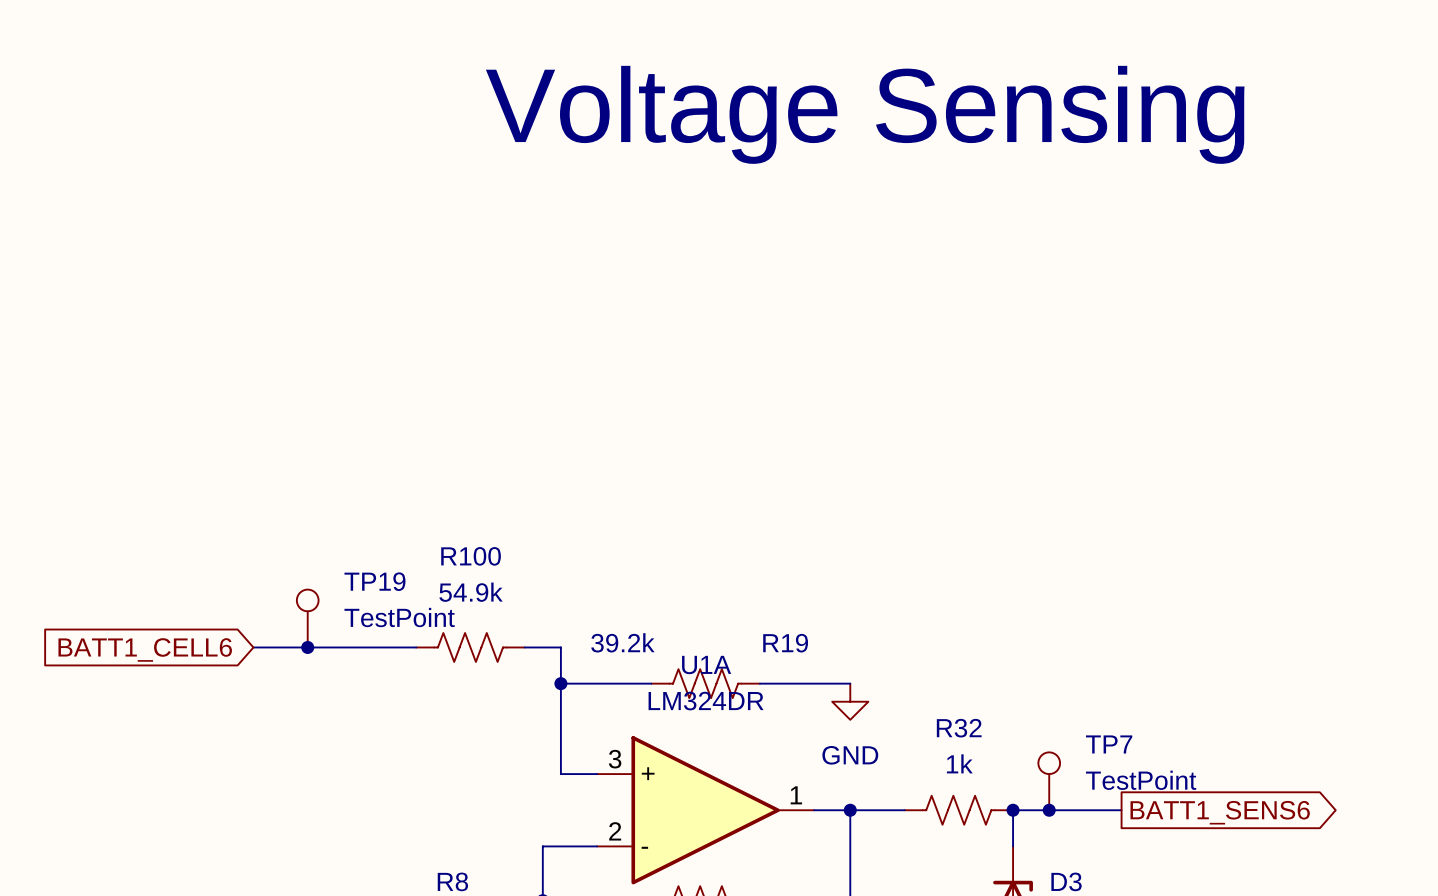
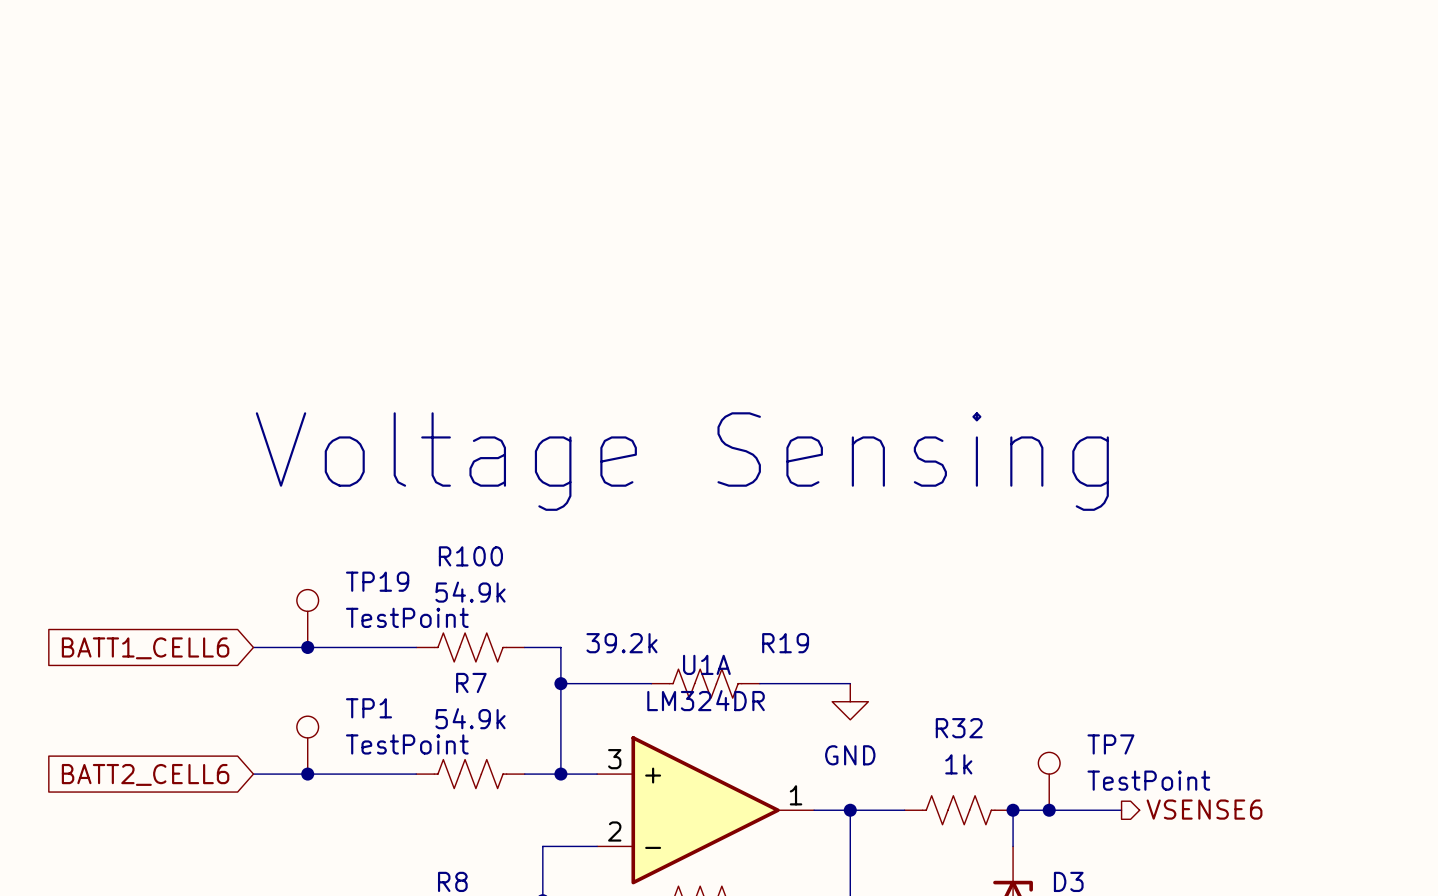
text: Voltage Sensing (865, 114) -> none
text: none -> Voltage Sensing (682, 461)
TP1: none -> TestPoint (307, 745)
wire: none -> (253, 774) (416, 774)
junction: none -> (307, 774)
R7: none -> 54.9k (470, 774)
wire: none -> (524, 774) (560, 774)
junction: none -> (560, 774)
global label: none -> BATT2_CELL6 (145, 774)
hierarchical label: none -> VSENSE6 (1204, 809)
global label: BATT1_SENS6 (1220, 812) -> none

